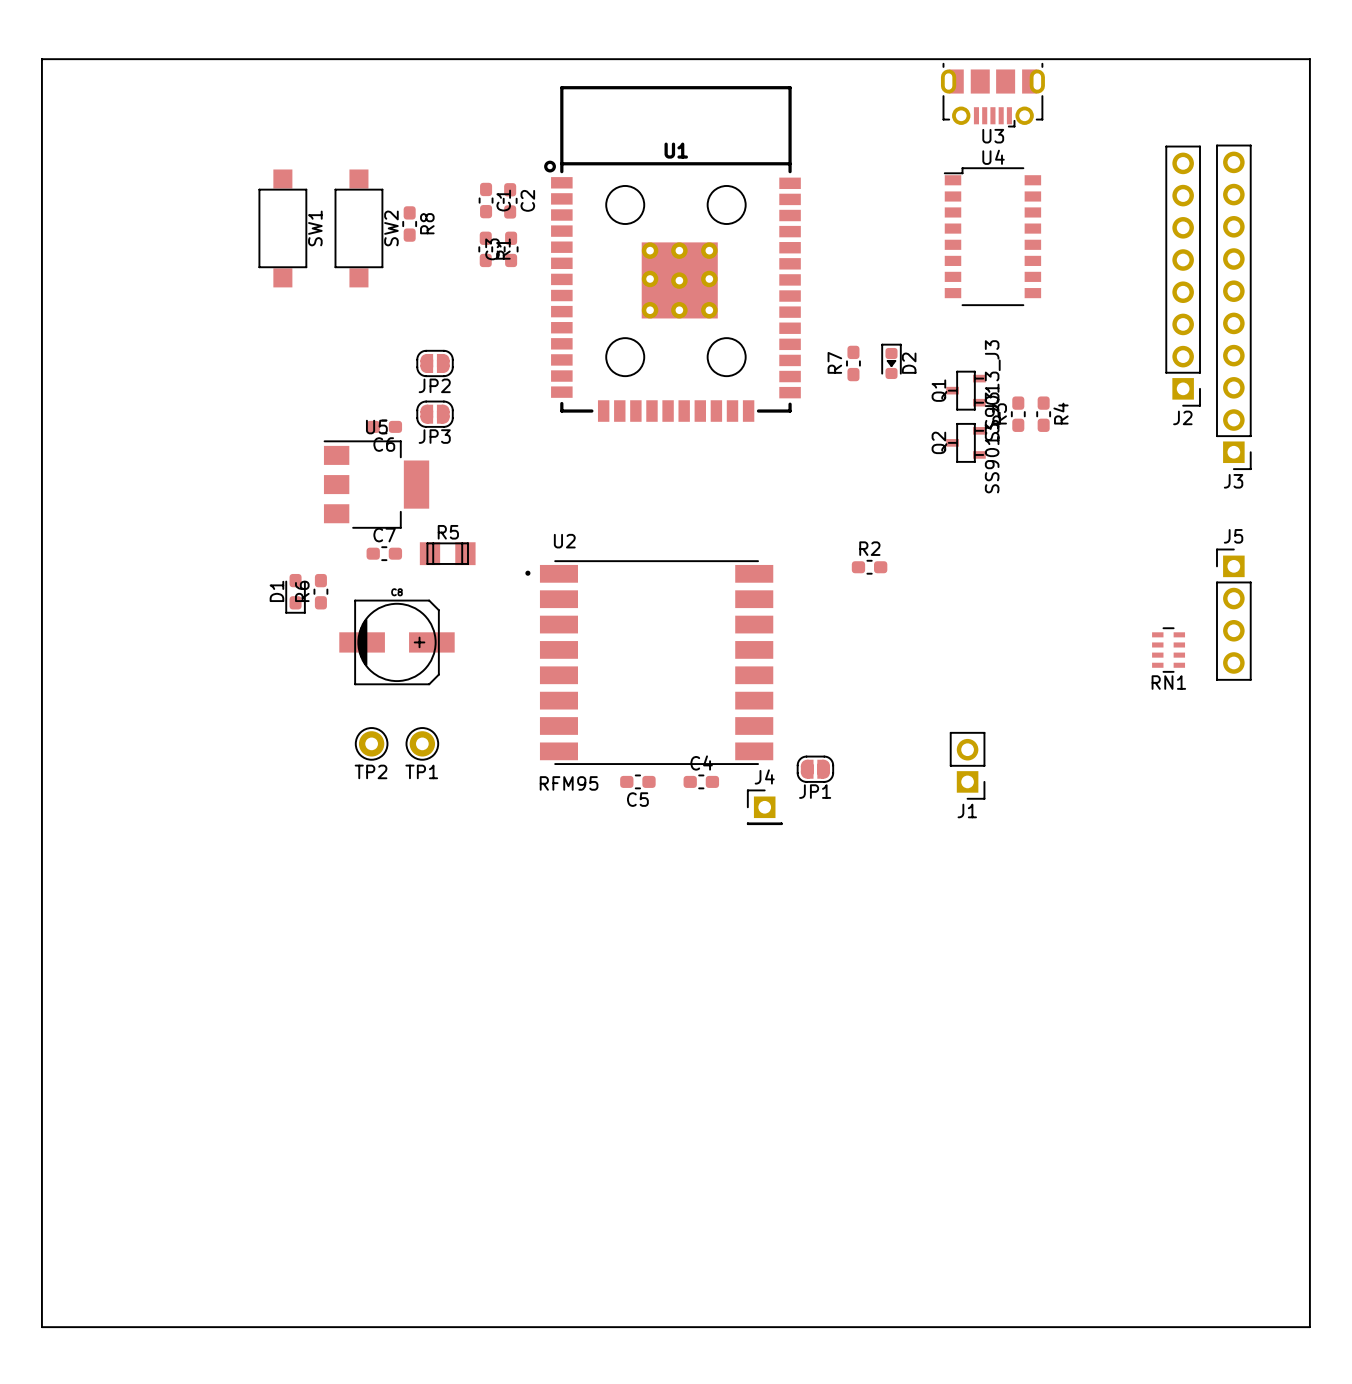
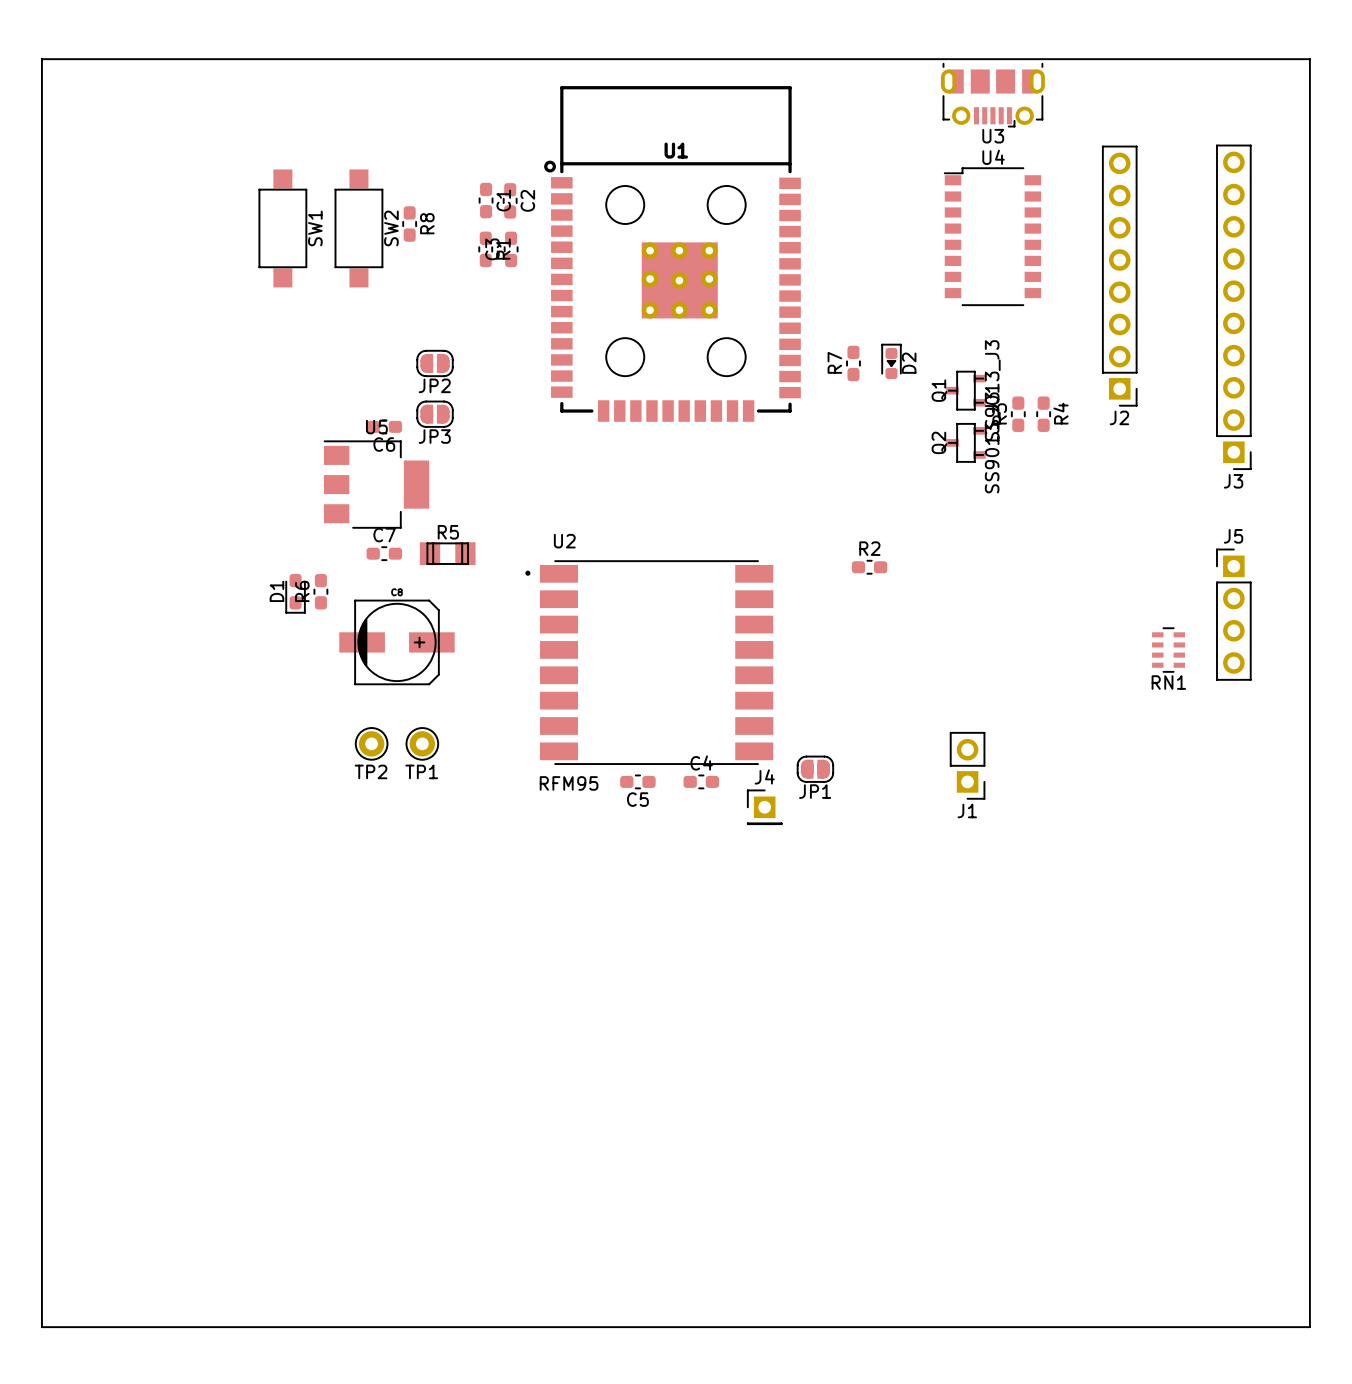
J2 position: (1183, 276) -> (1119, 276)

